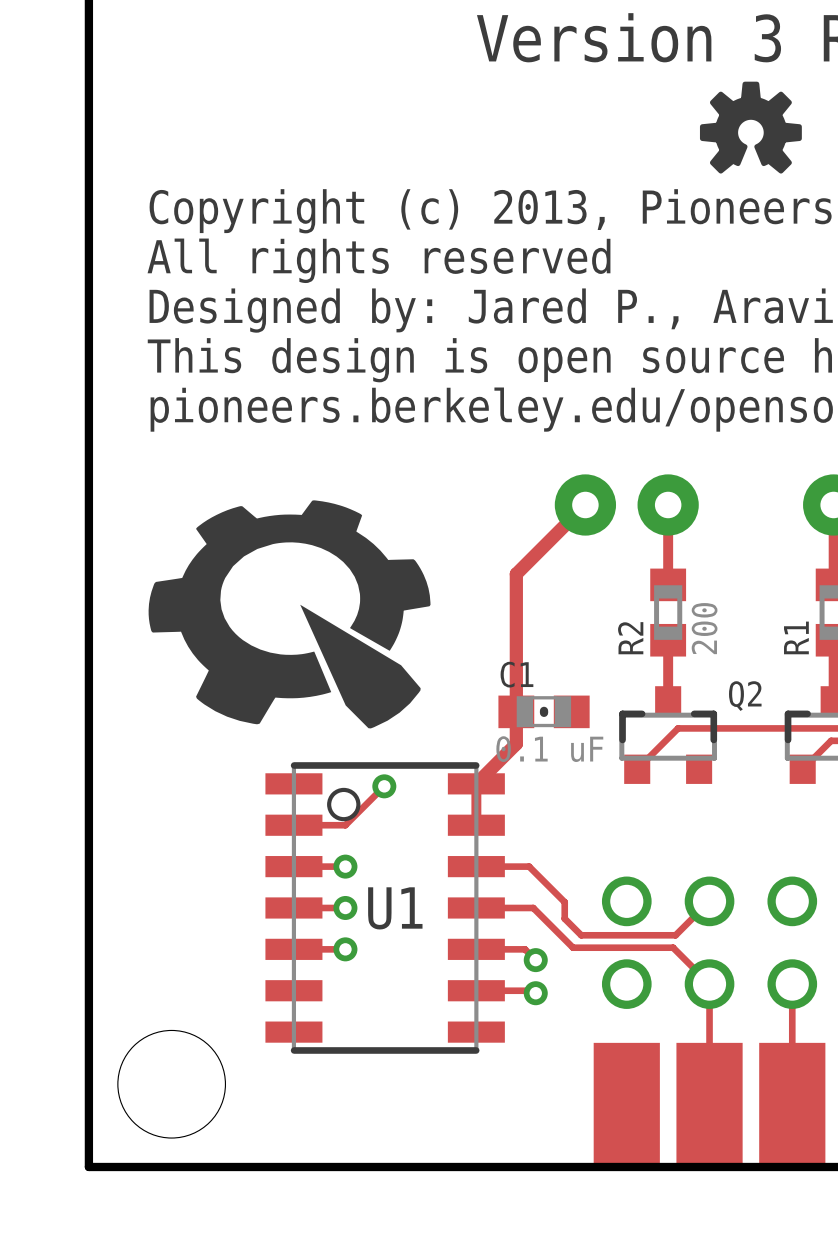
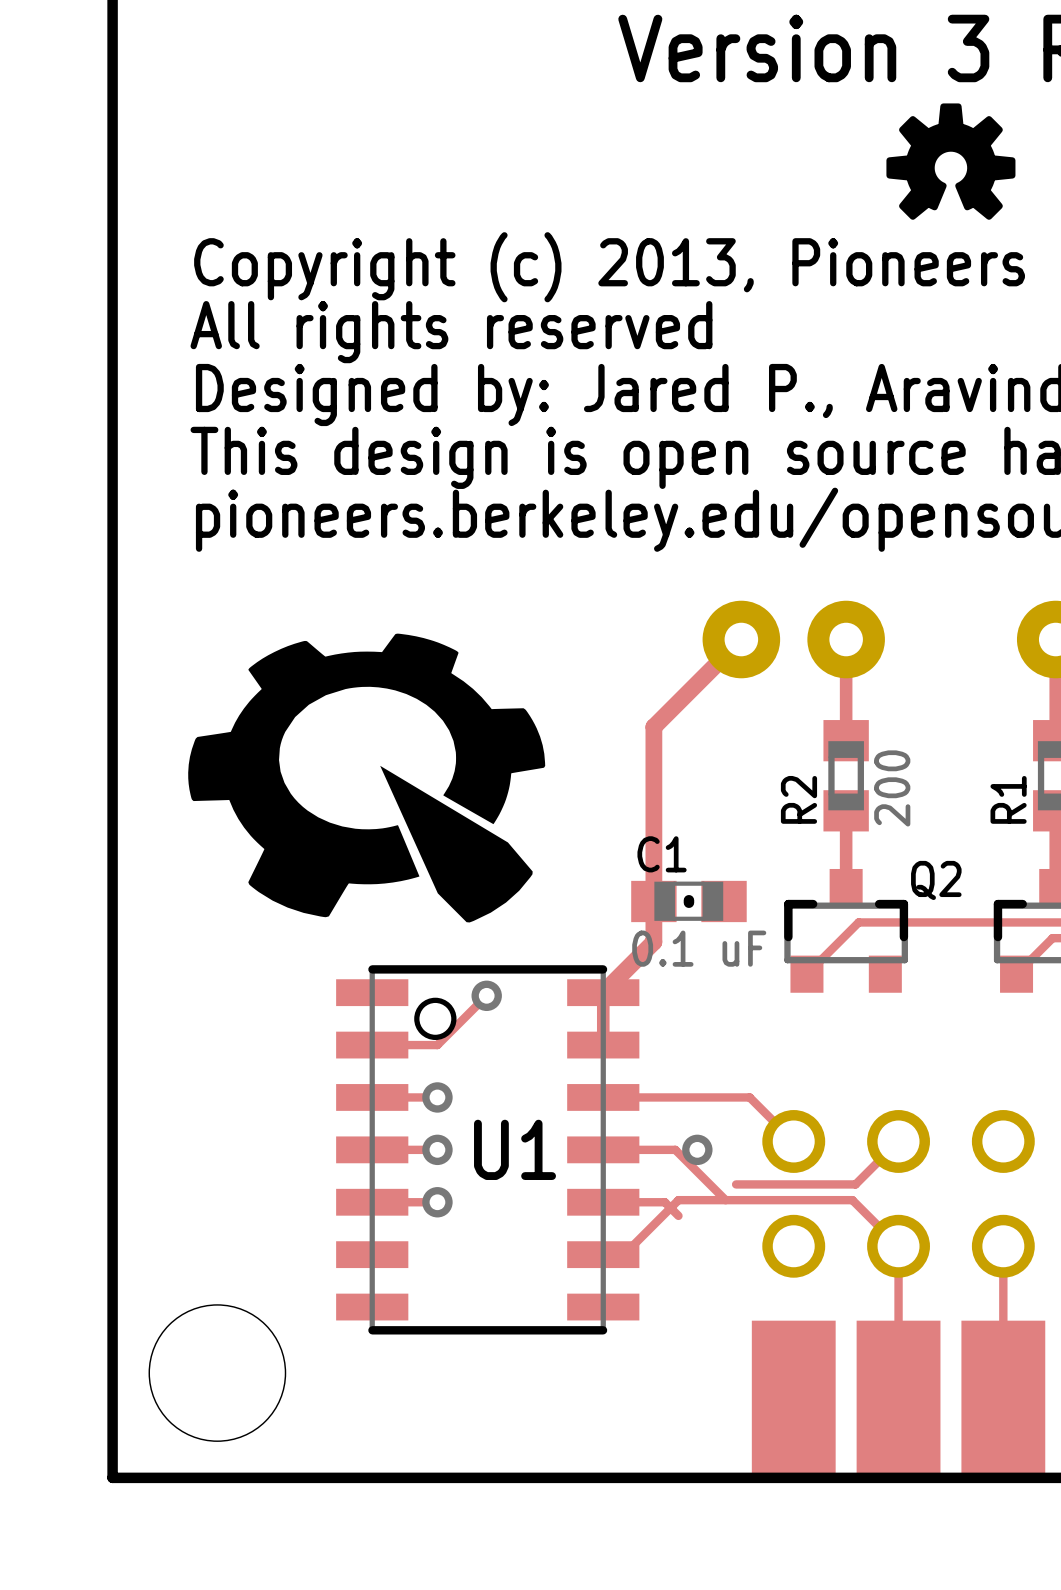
track: (529, 866) (564, 902) (564, 918) (581, 935) -> (670, 1097) (749, 1097) (793, 1141)
via: none -> (697, 1149)
via: (535, 960) -> none
track: (492, 990) (533, 990) (535, 993) -> (623, 1254) (678, 1200) (725, 1200)
via: (535, 993) -> none

